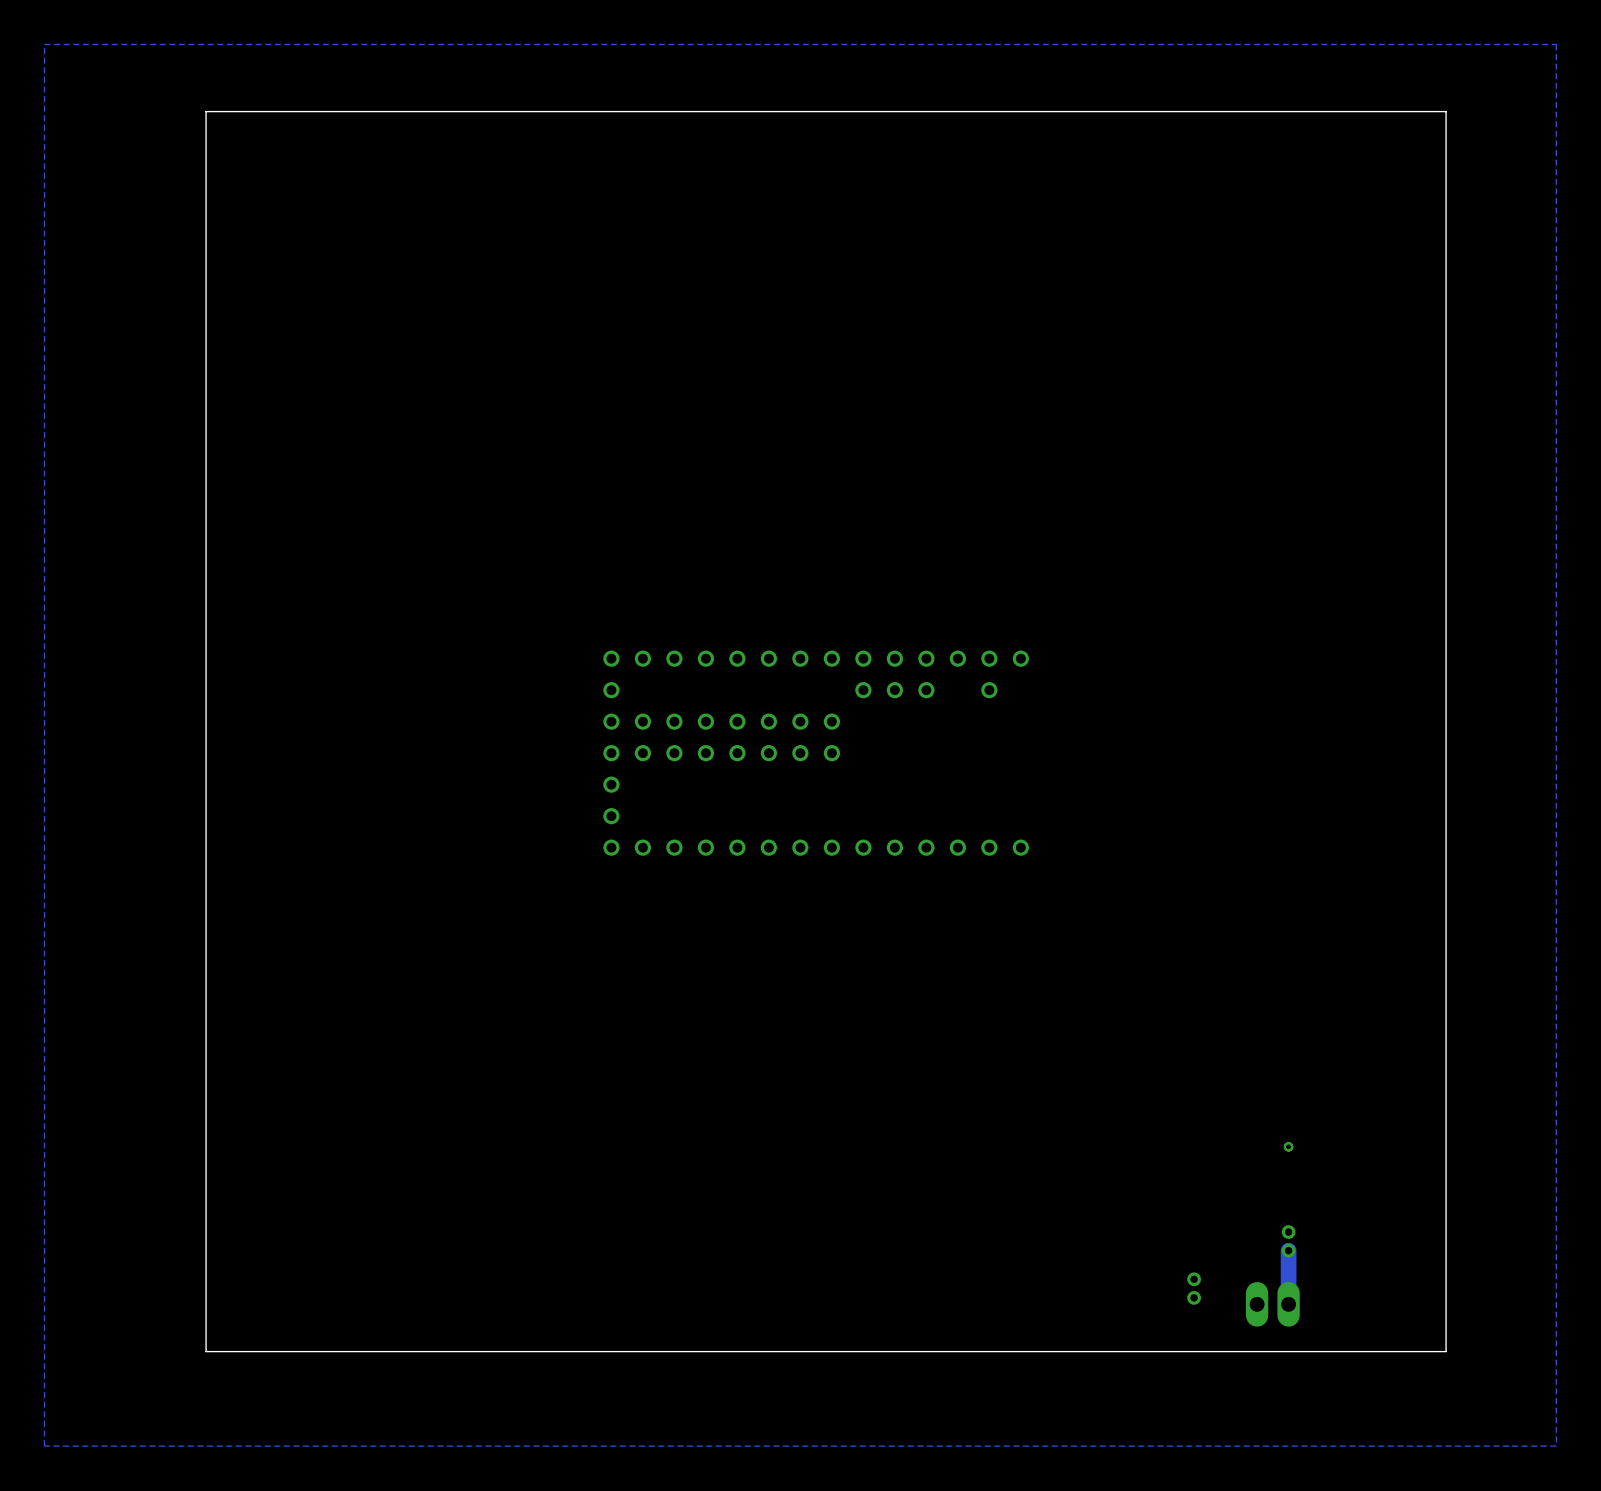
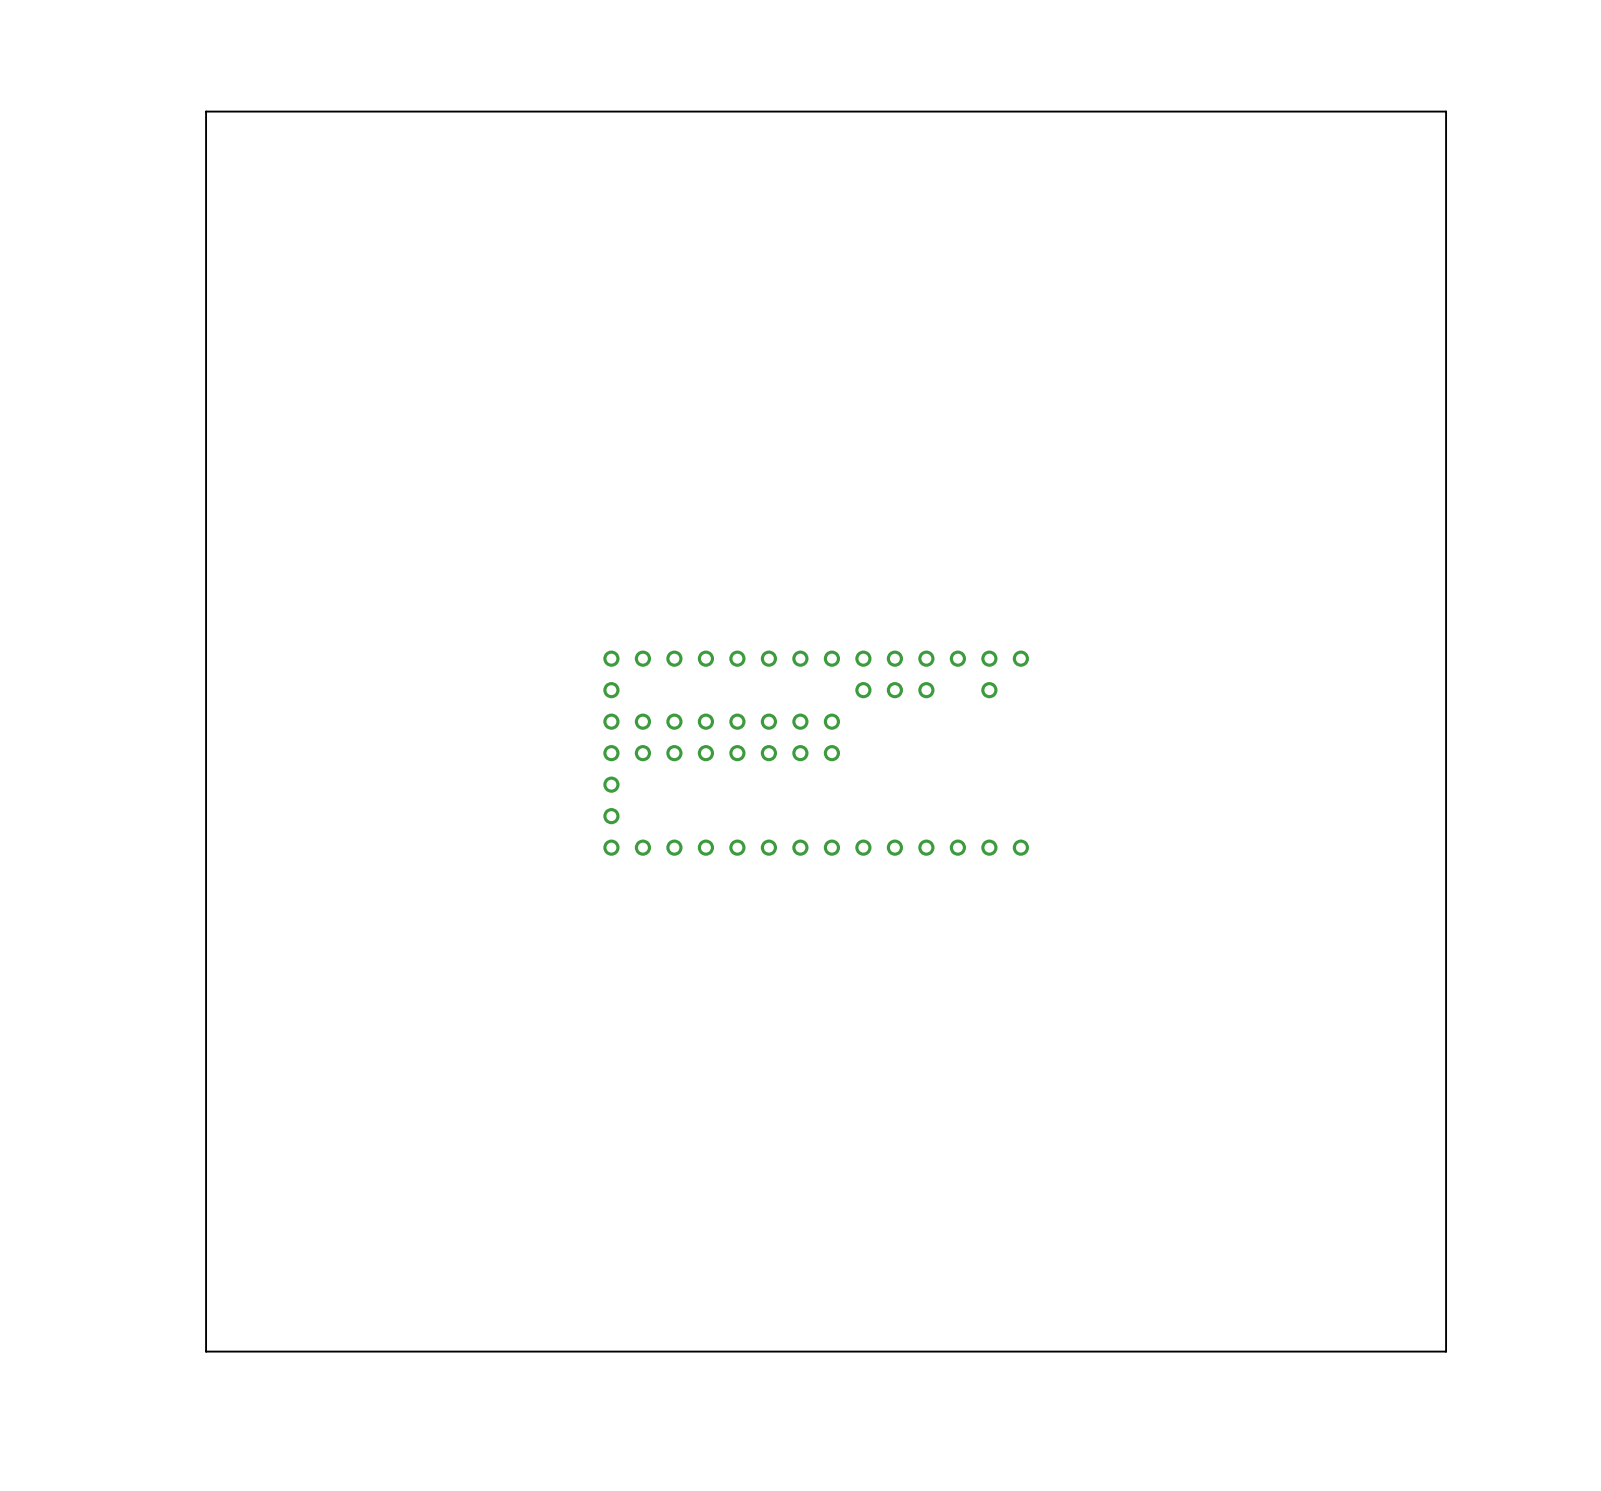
zone outline: (1556, 44) (44, 44) (44, 1446) (1556, 1446) (1556, 44) -> none
via: (1288, 1146) -> none
part: (1288, 1241) -> none
track: (1288, 1250) (1288, 1304) -> none
part: (1194, 1288) -> none
part: (1272, 1304) -> none

